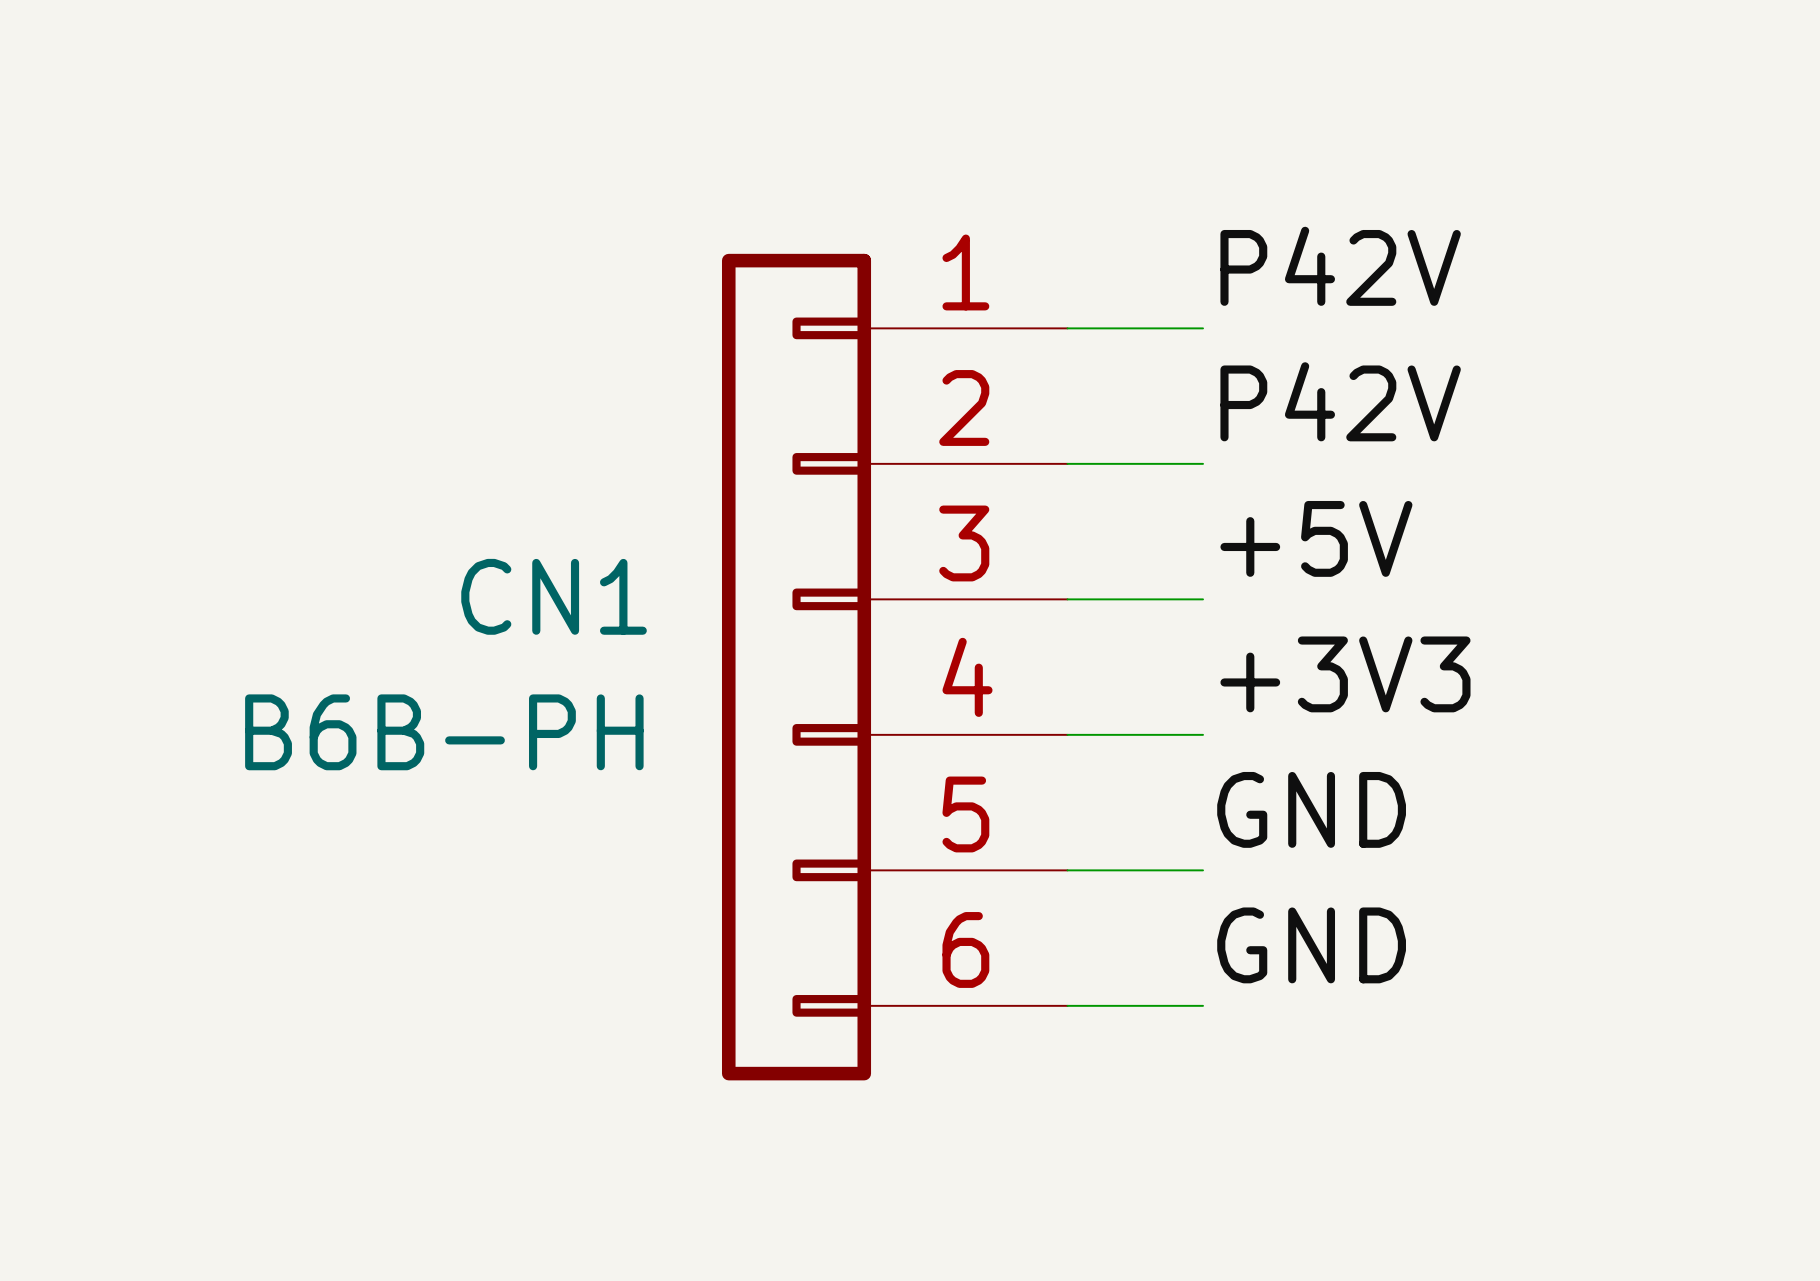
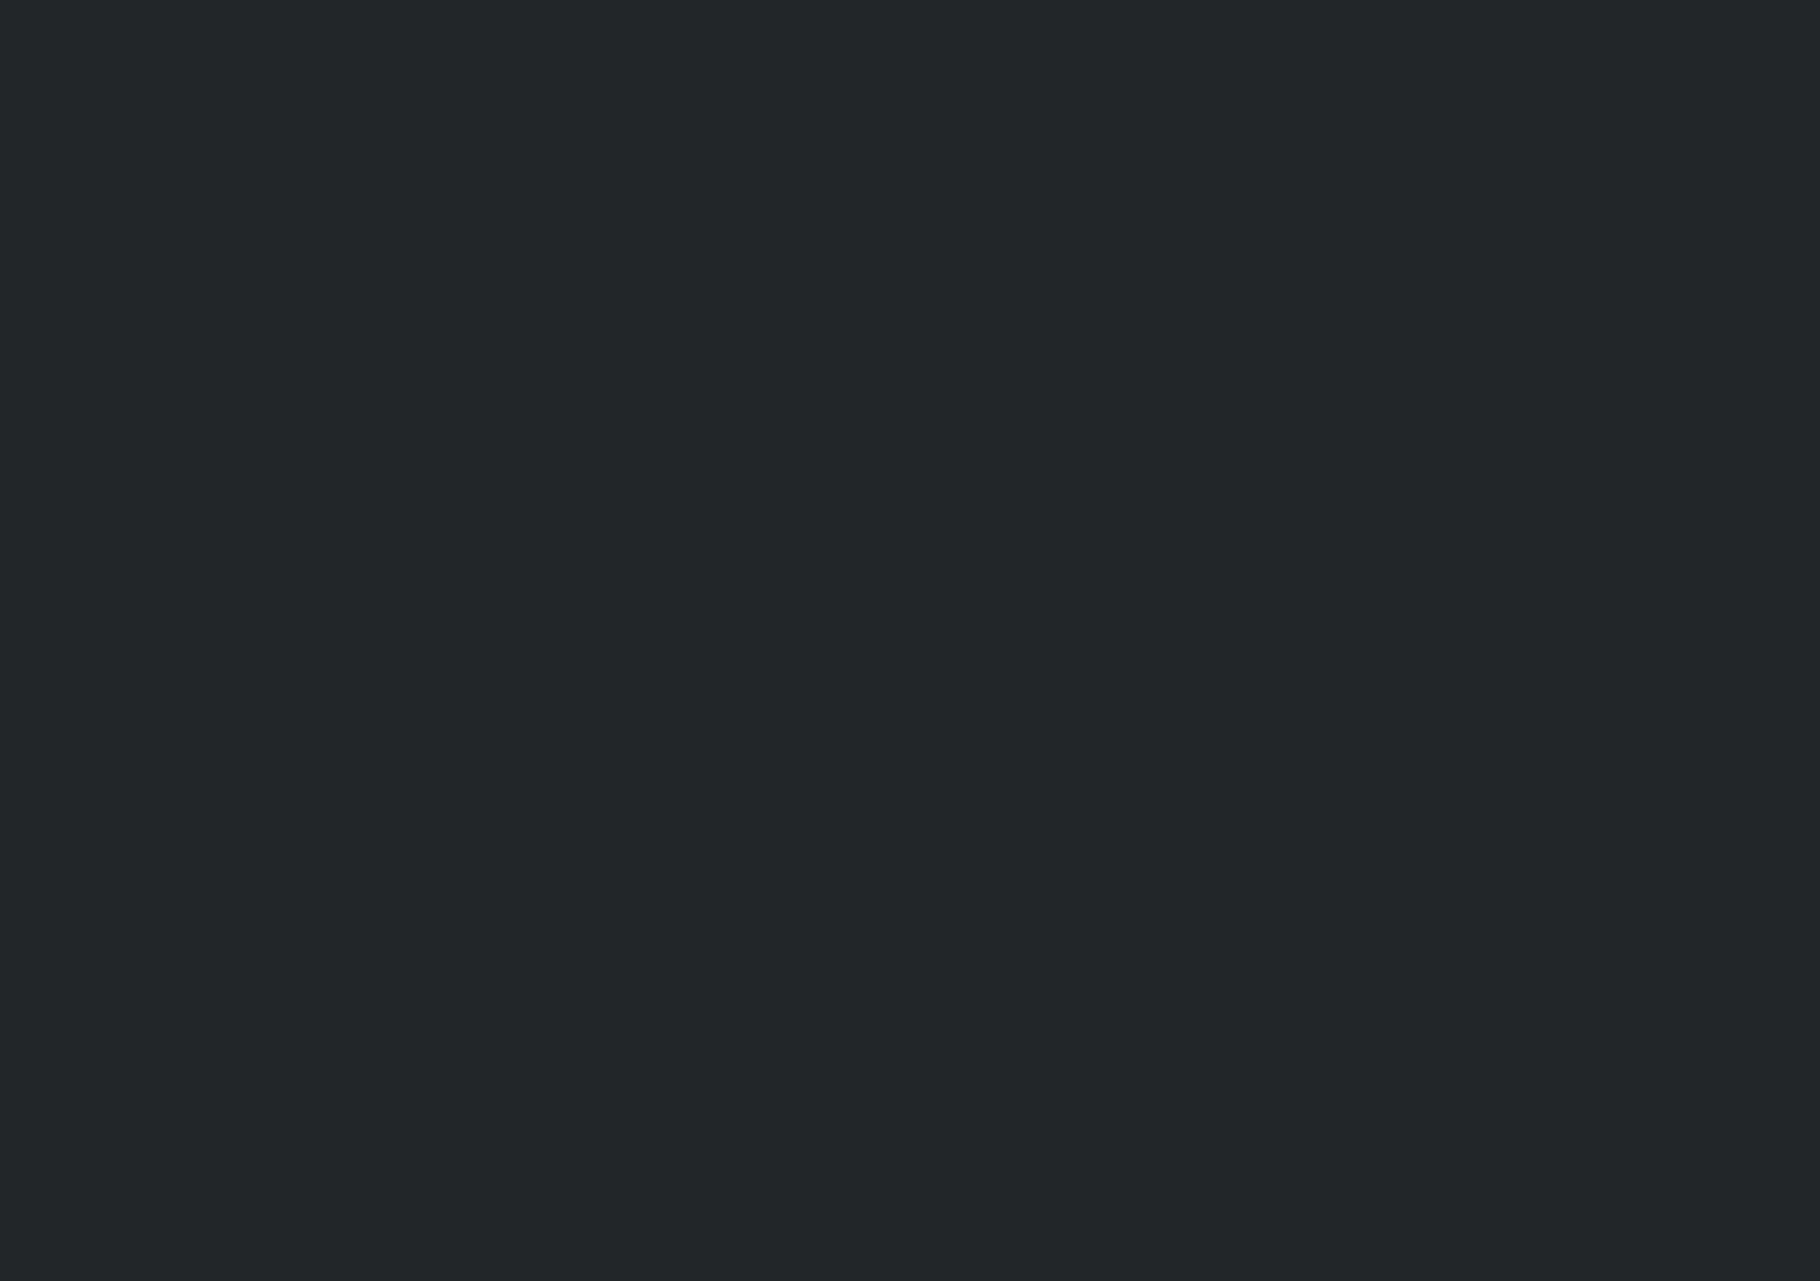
label: P42V (1340, 266) -> none
wire: (1067, 328) (1203, 328) -> none
label: P42V (1340, 401) -> none
wire: (1067, 463) (1203, 463) -> none
label: +5V (1316, 538) -> none
wire: (1067, 599) (1203, 599) -> none
CN1: B6B-PH (894, 667) -> none
label: +3V3 (1345, 674) -> none
wire: (1067, 734) (1203, 734) -> none
label: GND (1311, 809) -> none
wire: (1067, 870) (1203, 870) -> none
label: GND (1311, 945) -> none
wire: (1067, 1005) (1203, 1005) -> none

